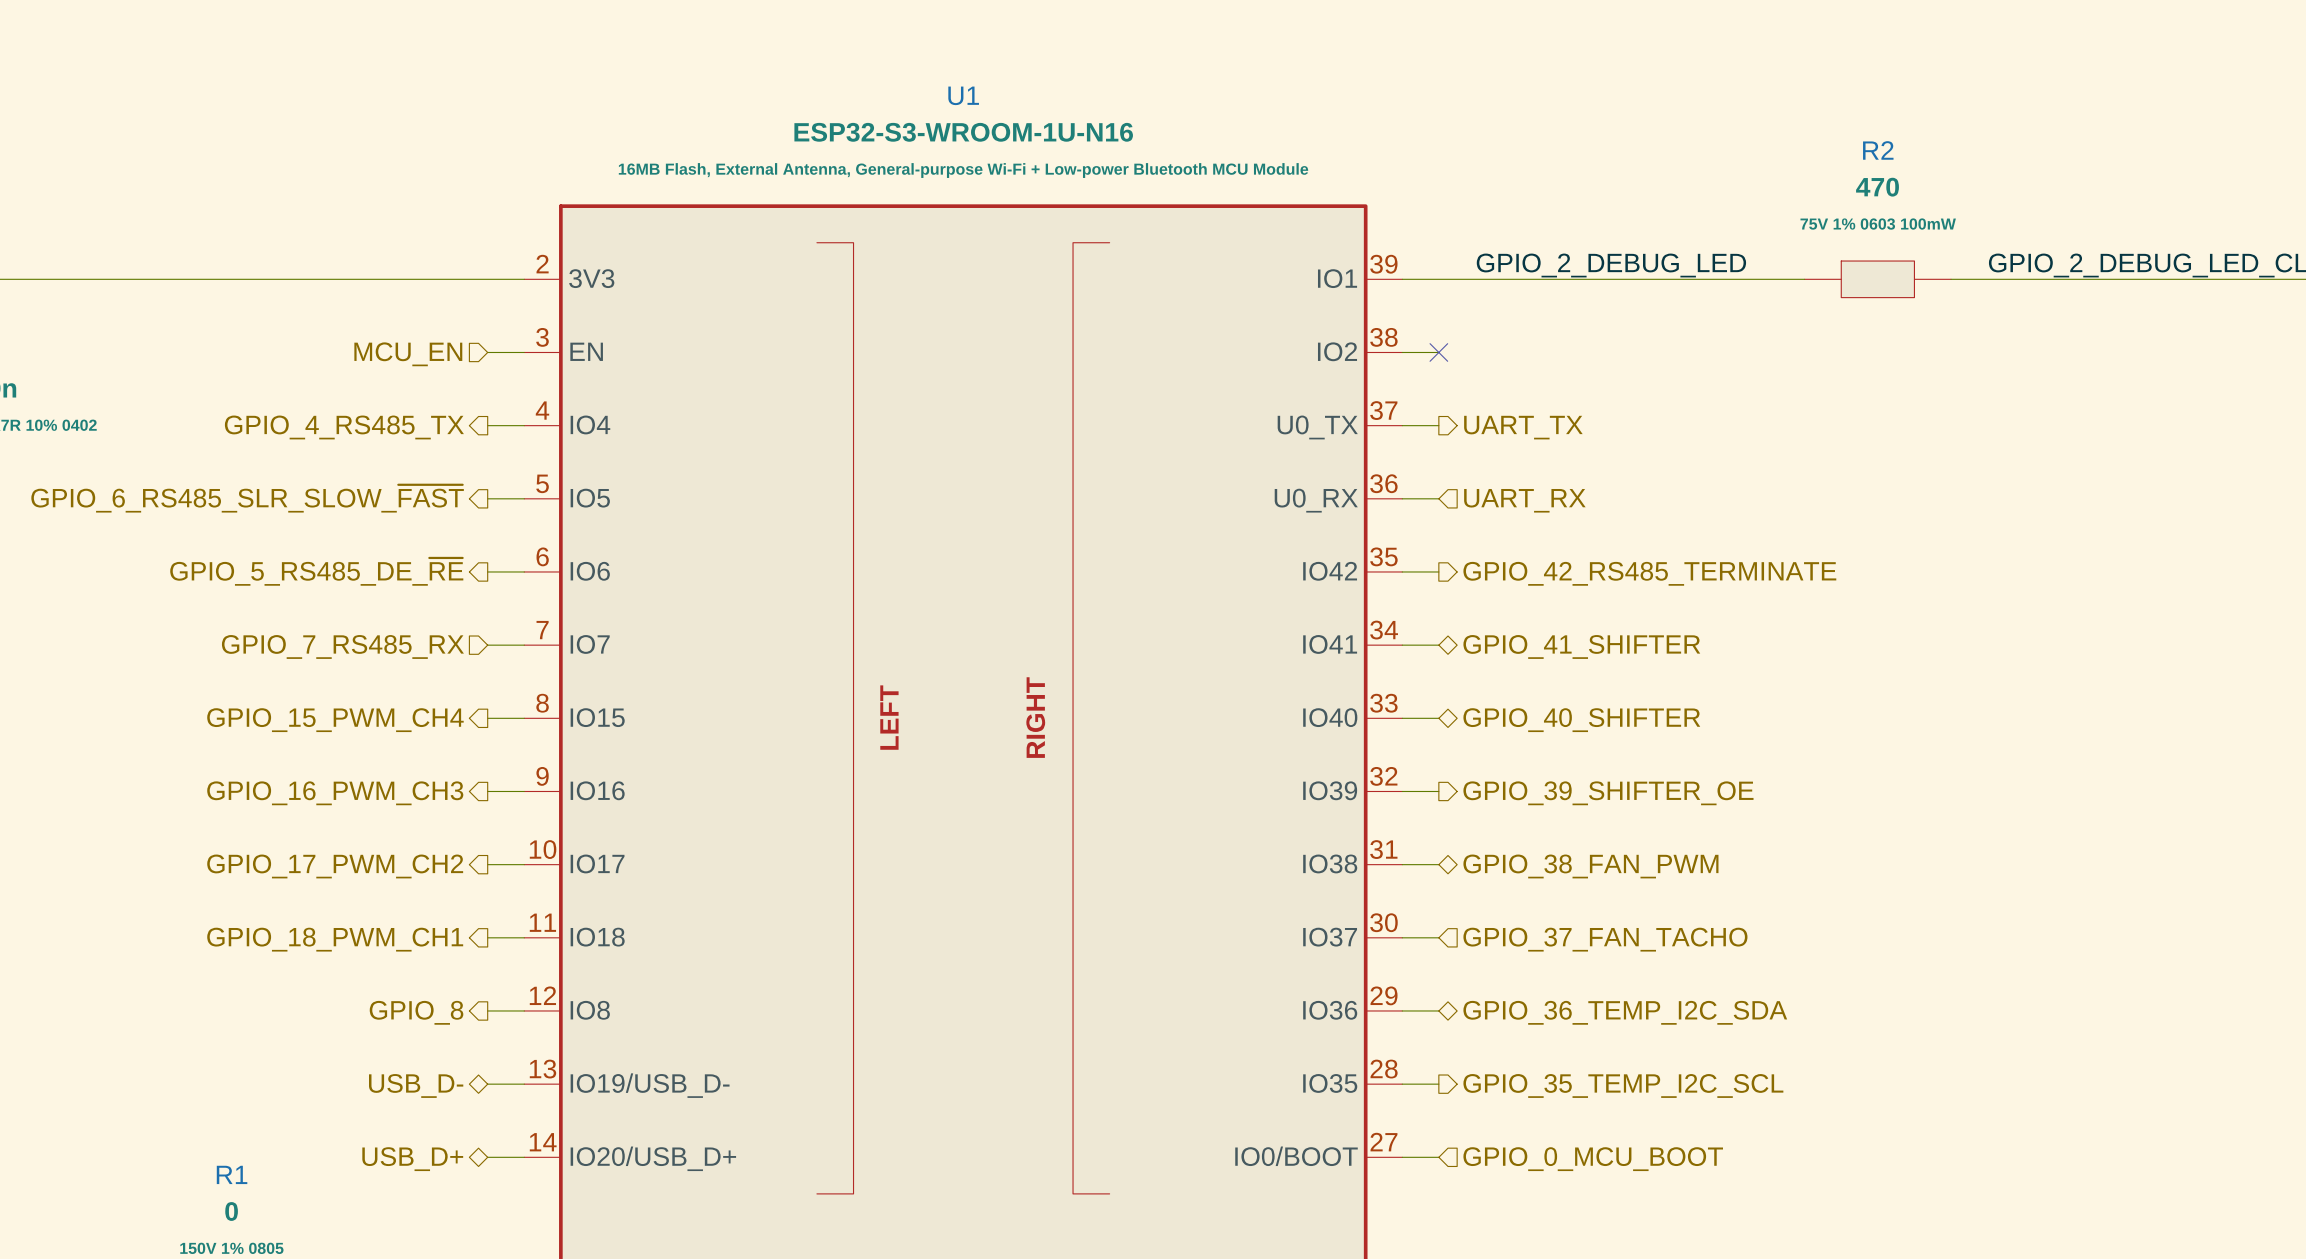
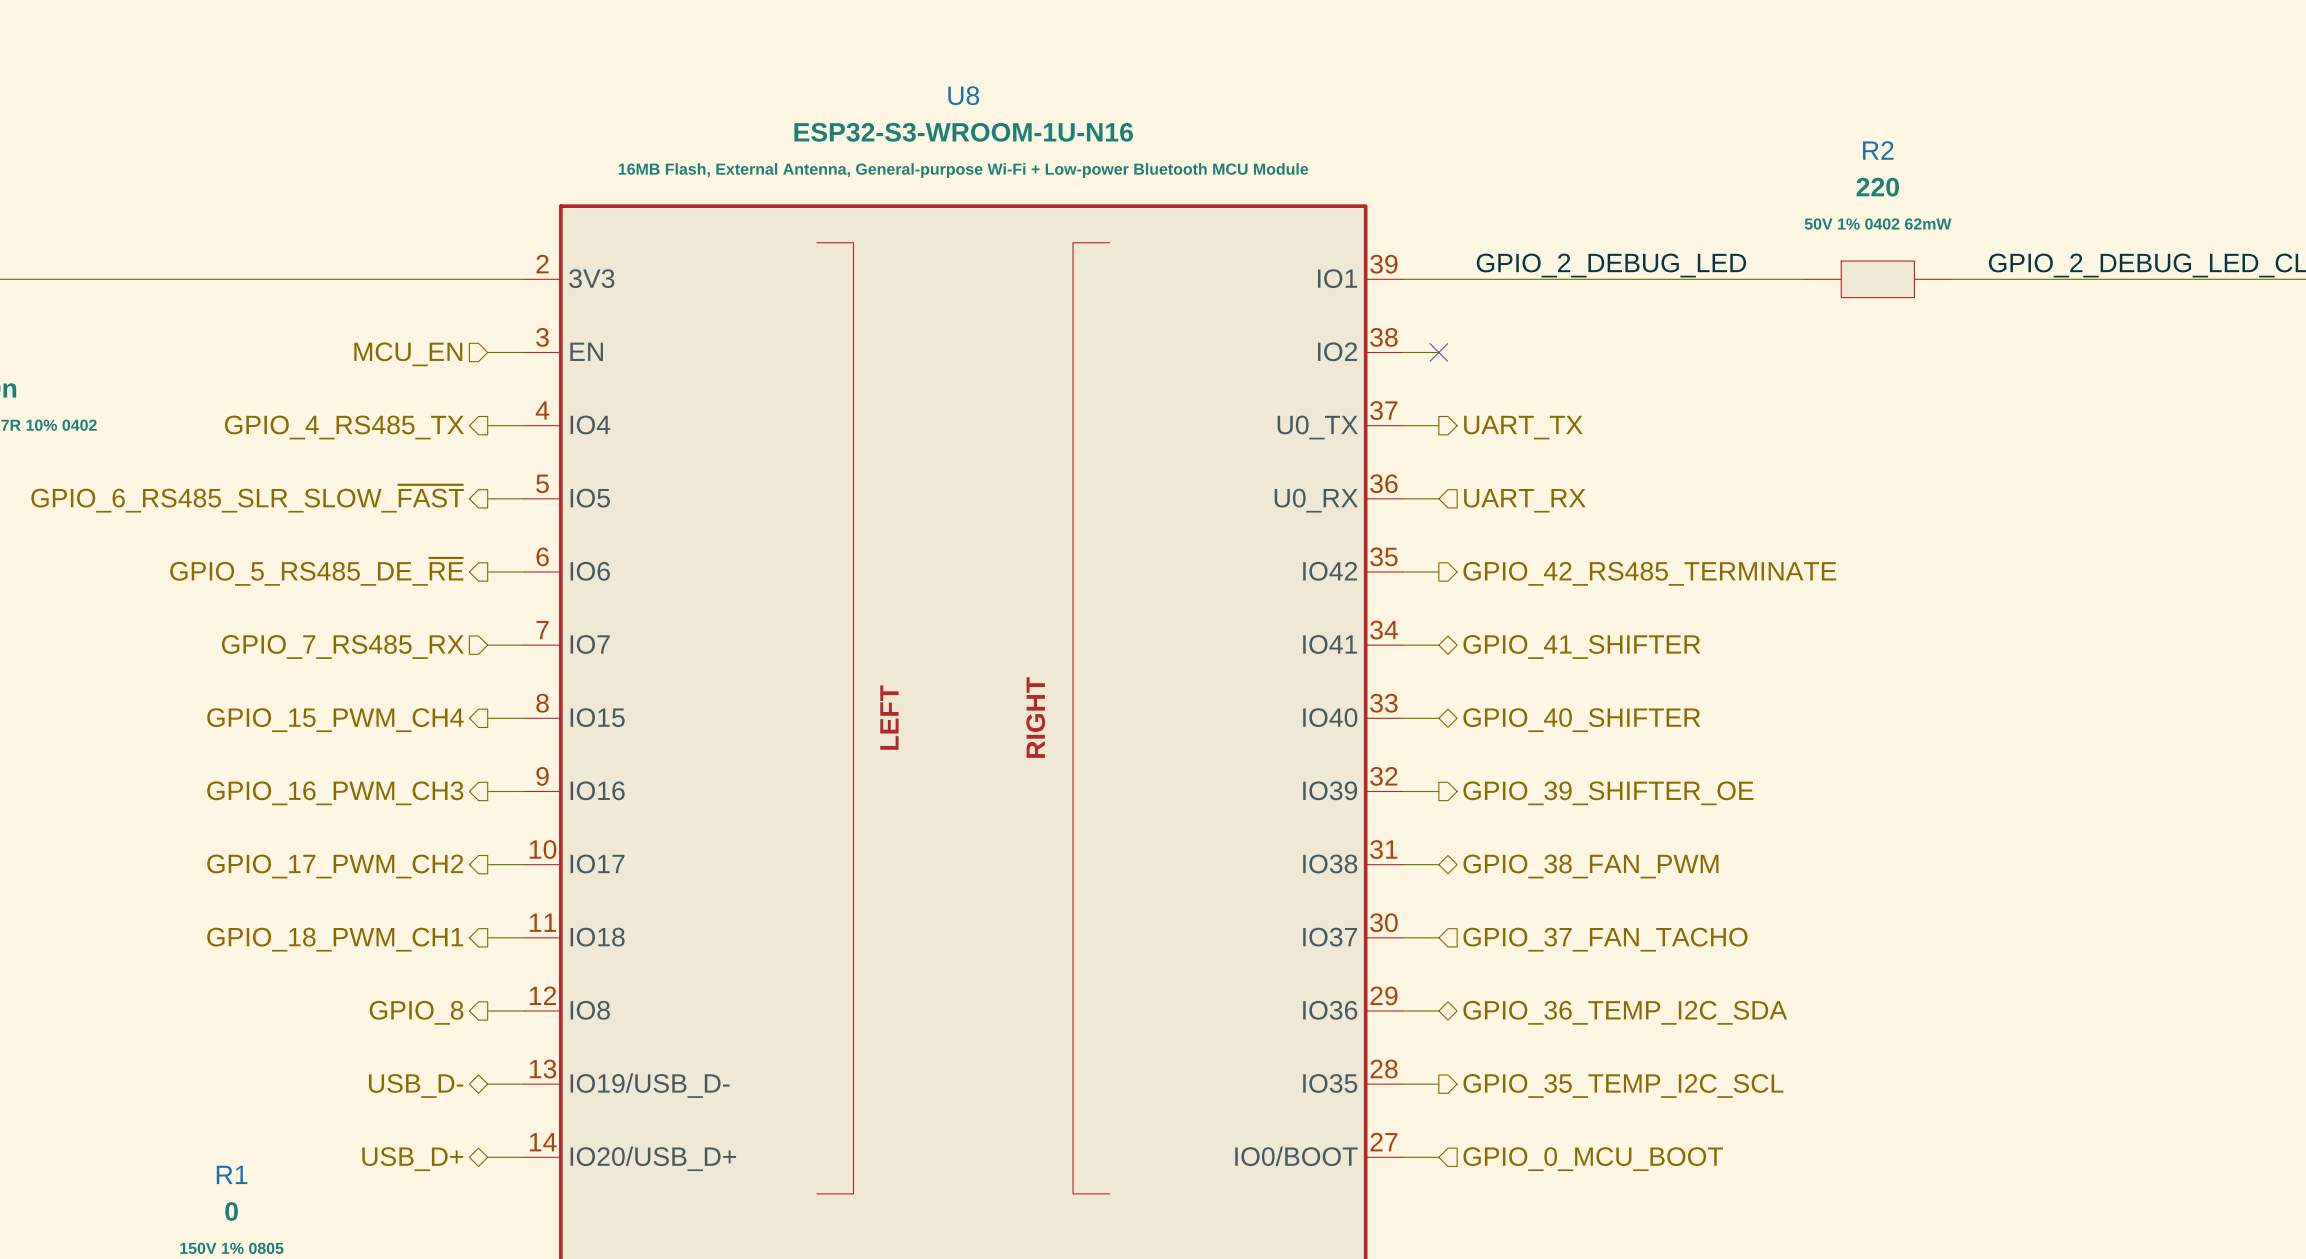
U1 name: U1 (963, 95) -> U8 (963, 95)
R2 value: 470 (1877, 187) -> 220 (1877, 187)
R2 text: 75V 1% 0603 100mW (1878, 224) -> 50V 1% 0402 62mW (1878, 224)

